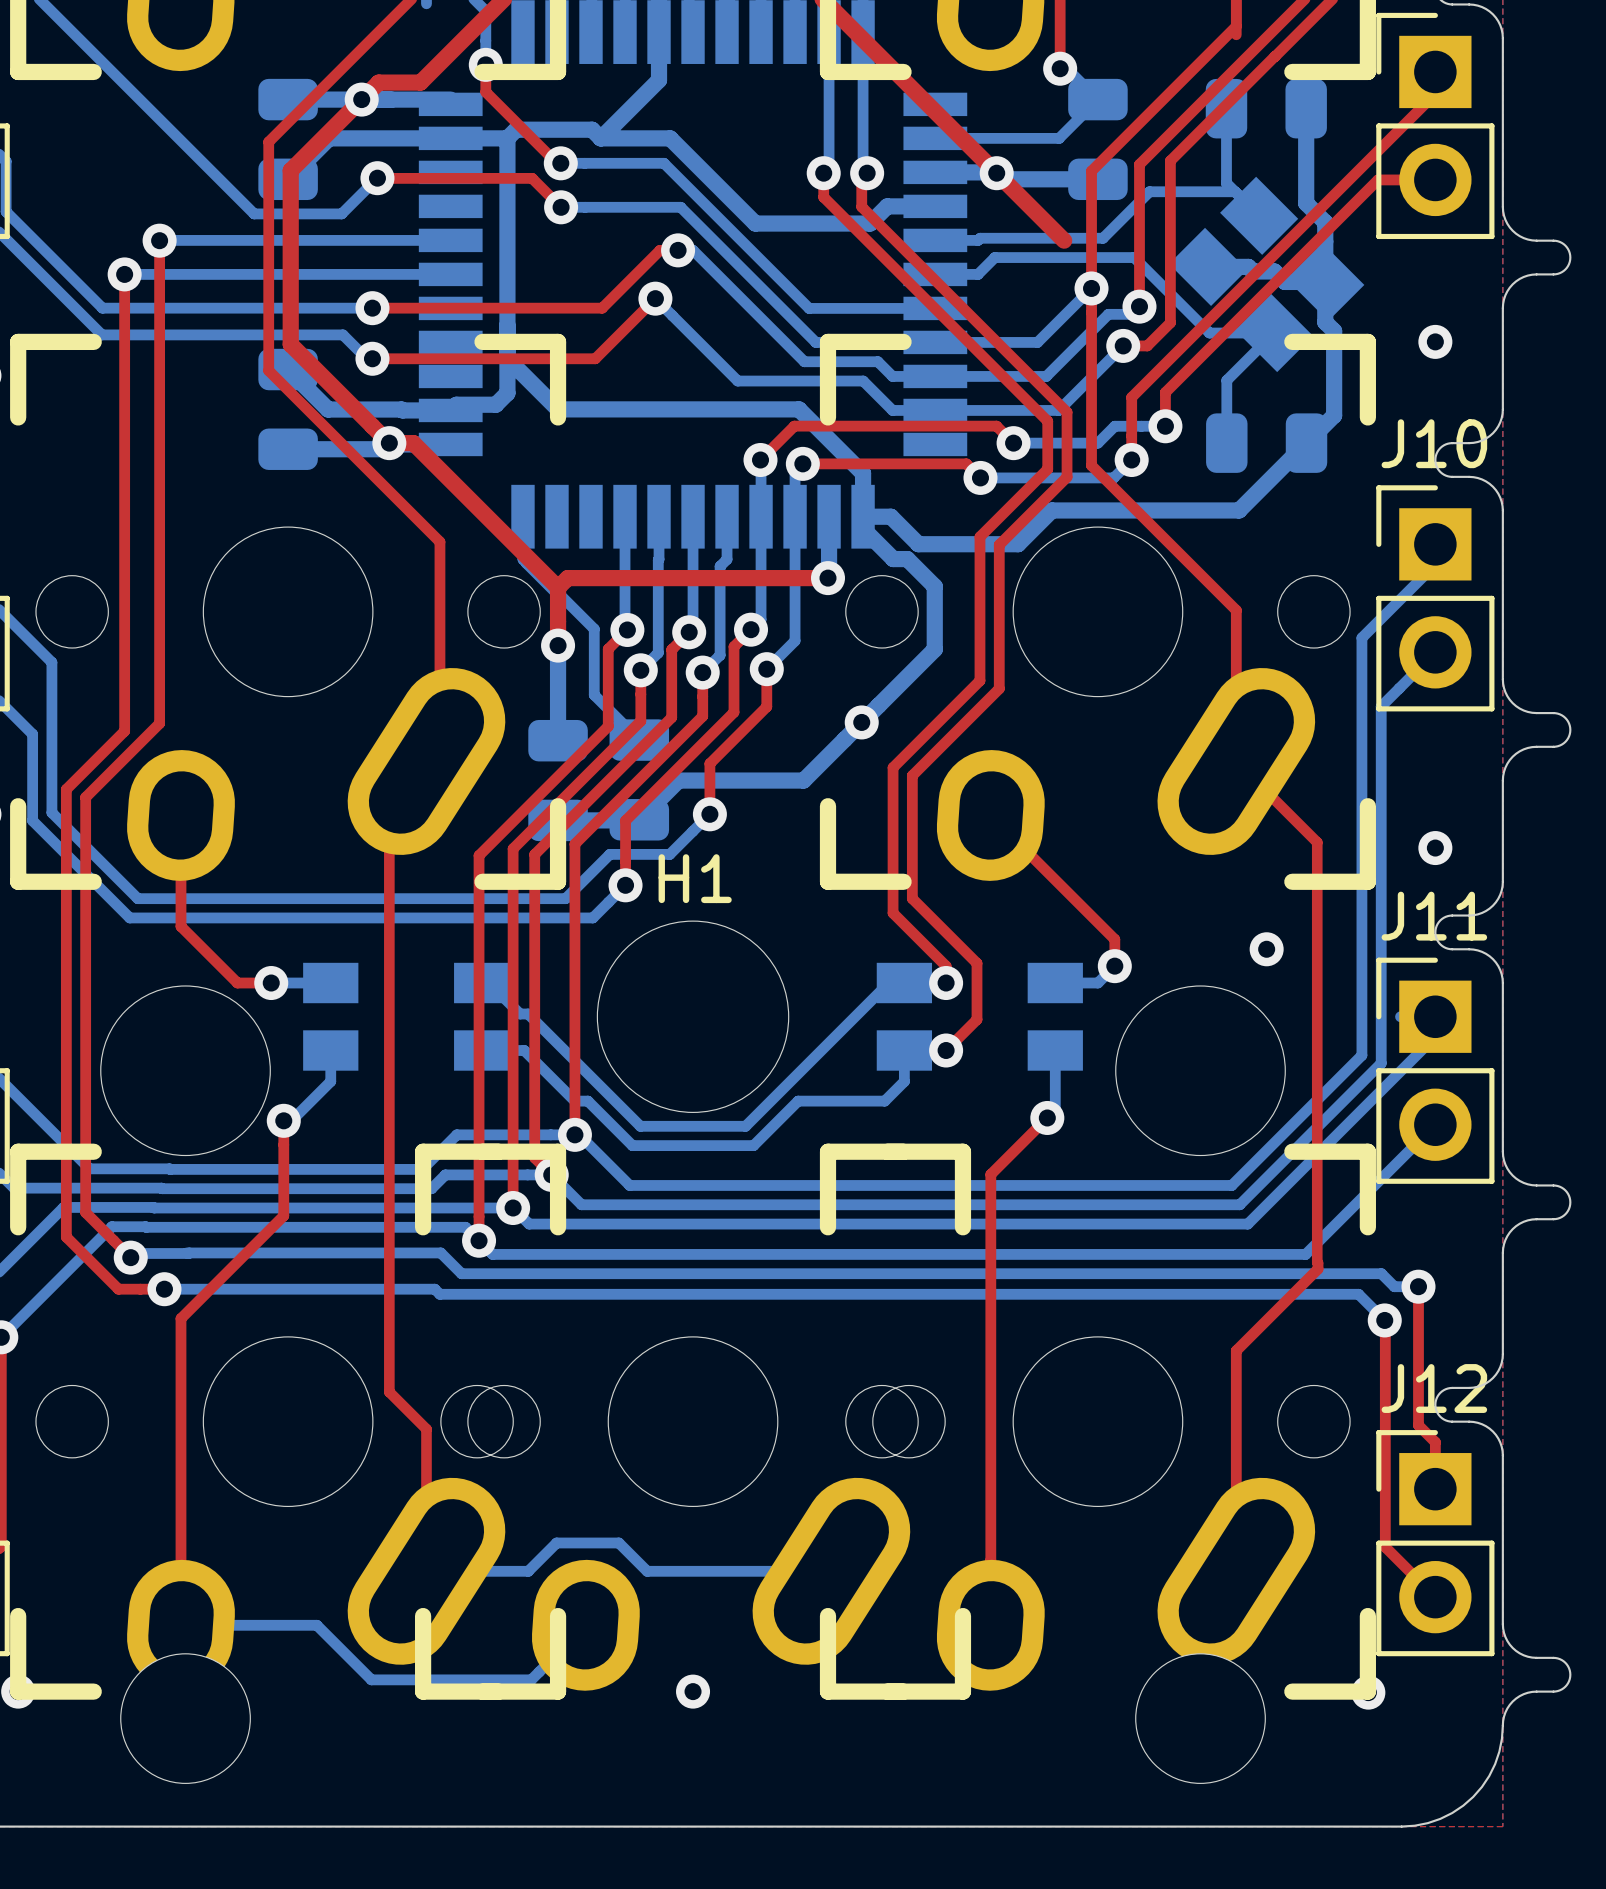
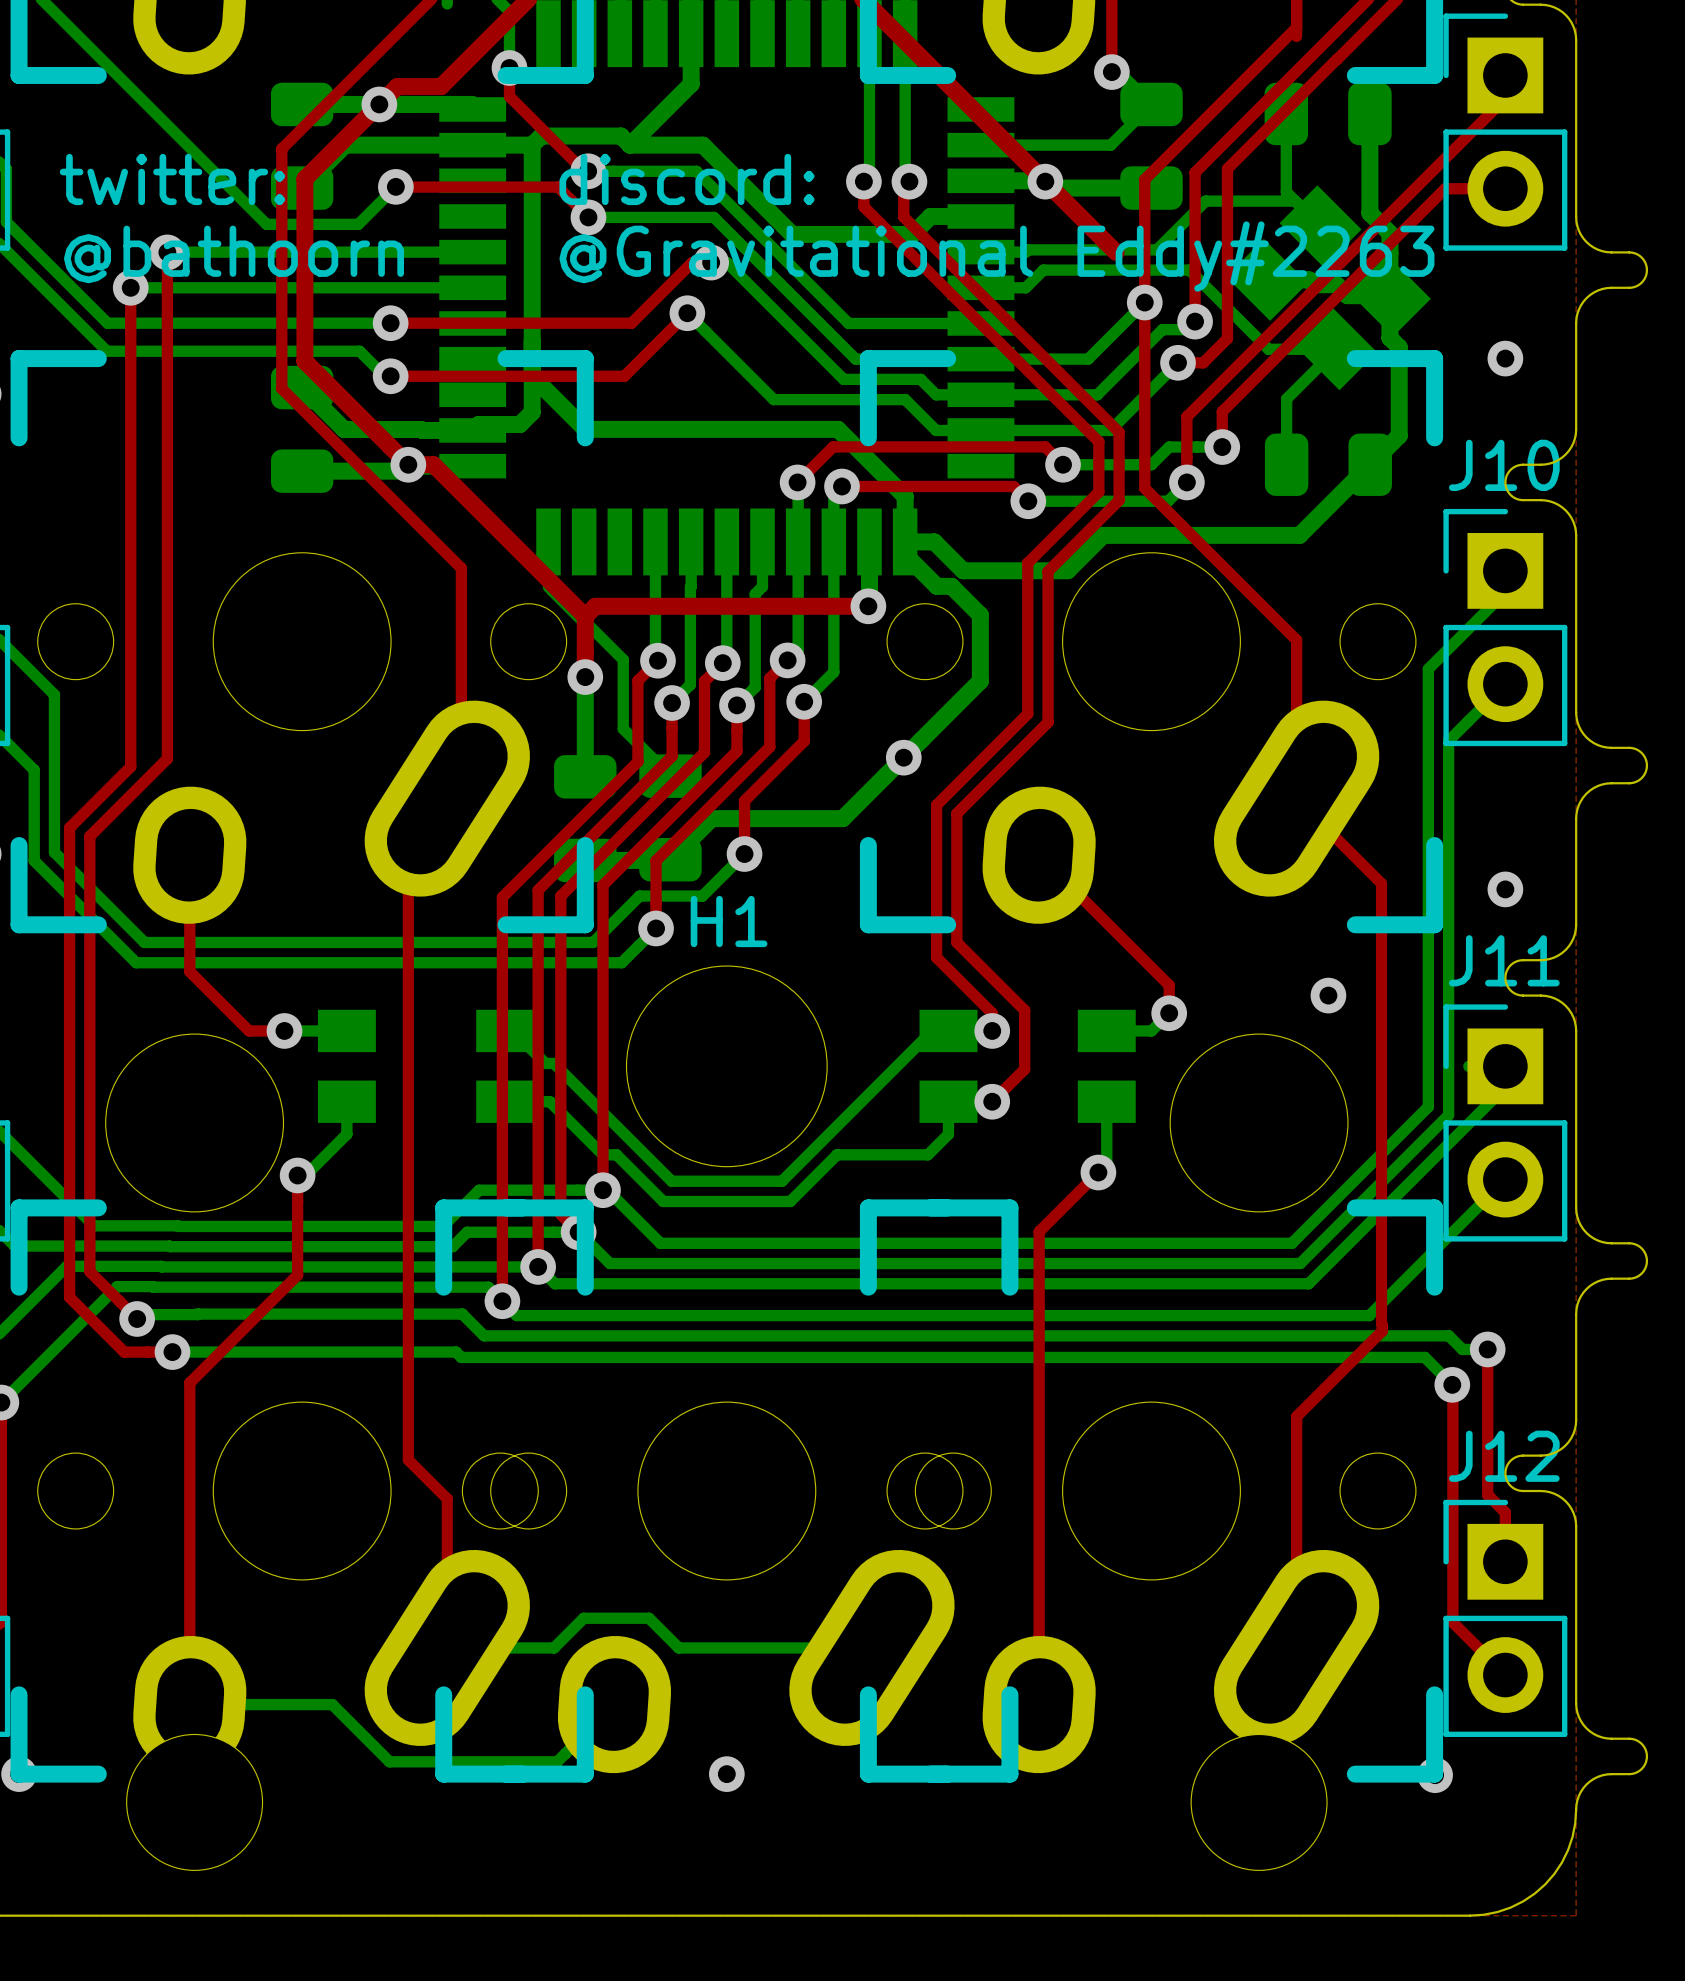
text: none -> twitter: (172, 179)
text: none -> discord: (686, 179)
text: none -> @bathoorn (234, 254)
text: none -> @Gravitational Eddy#2263 (996, 256)

